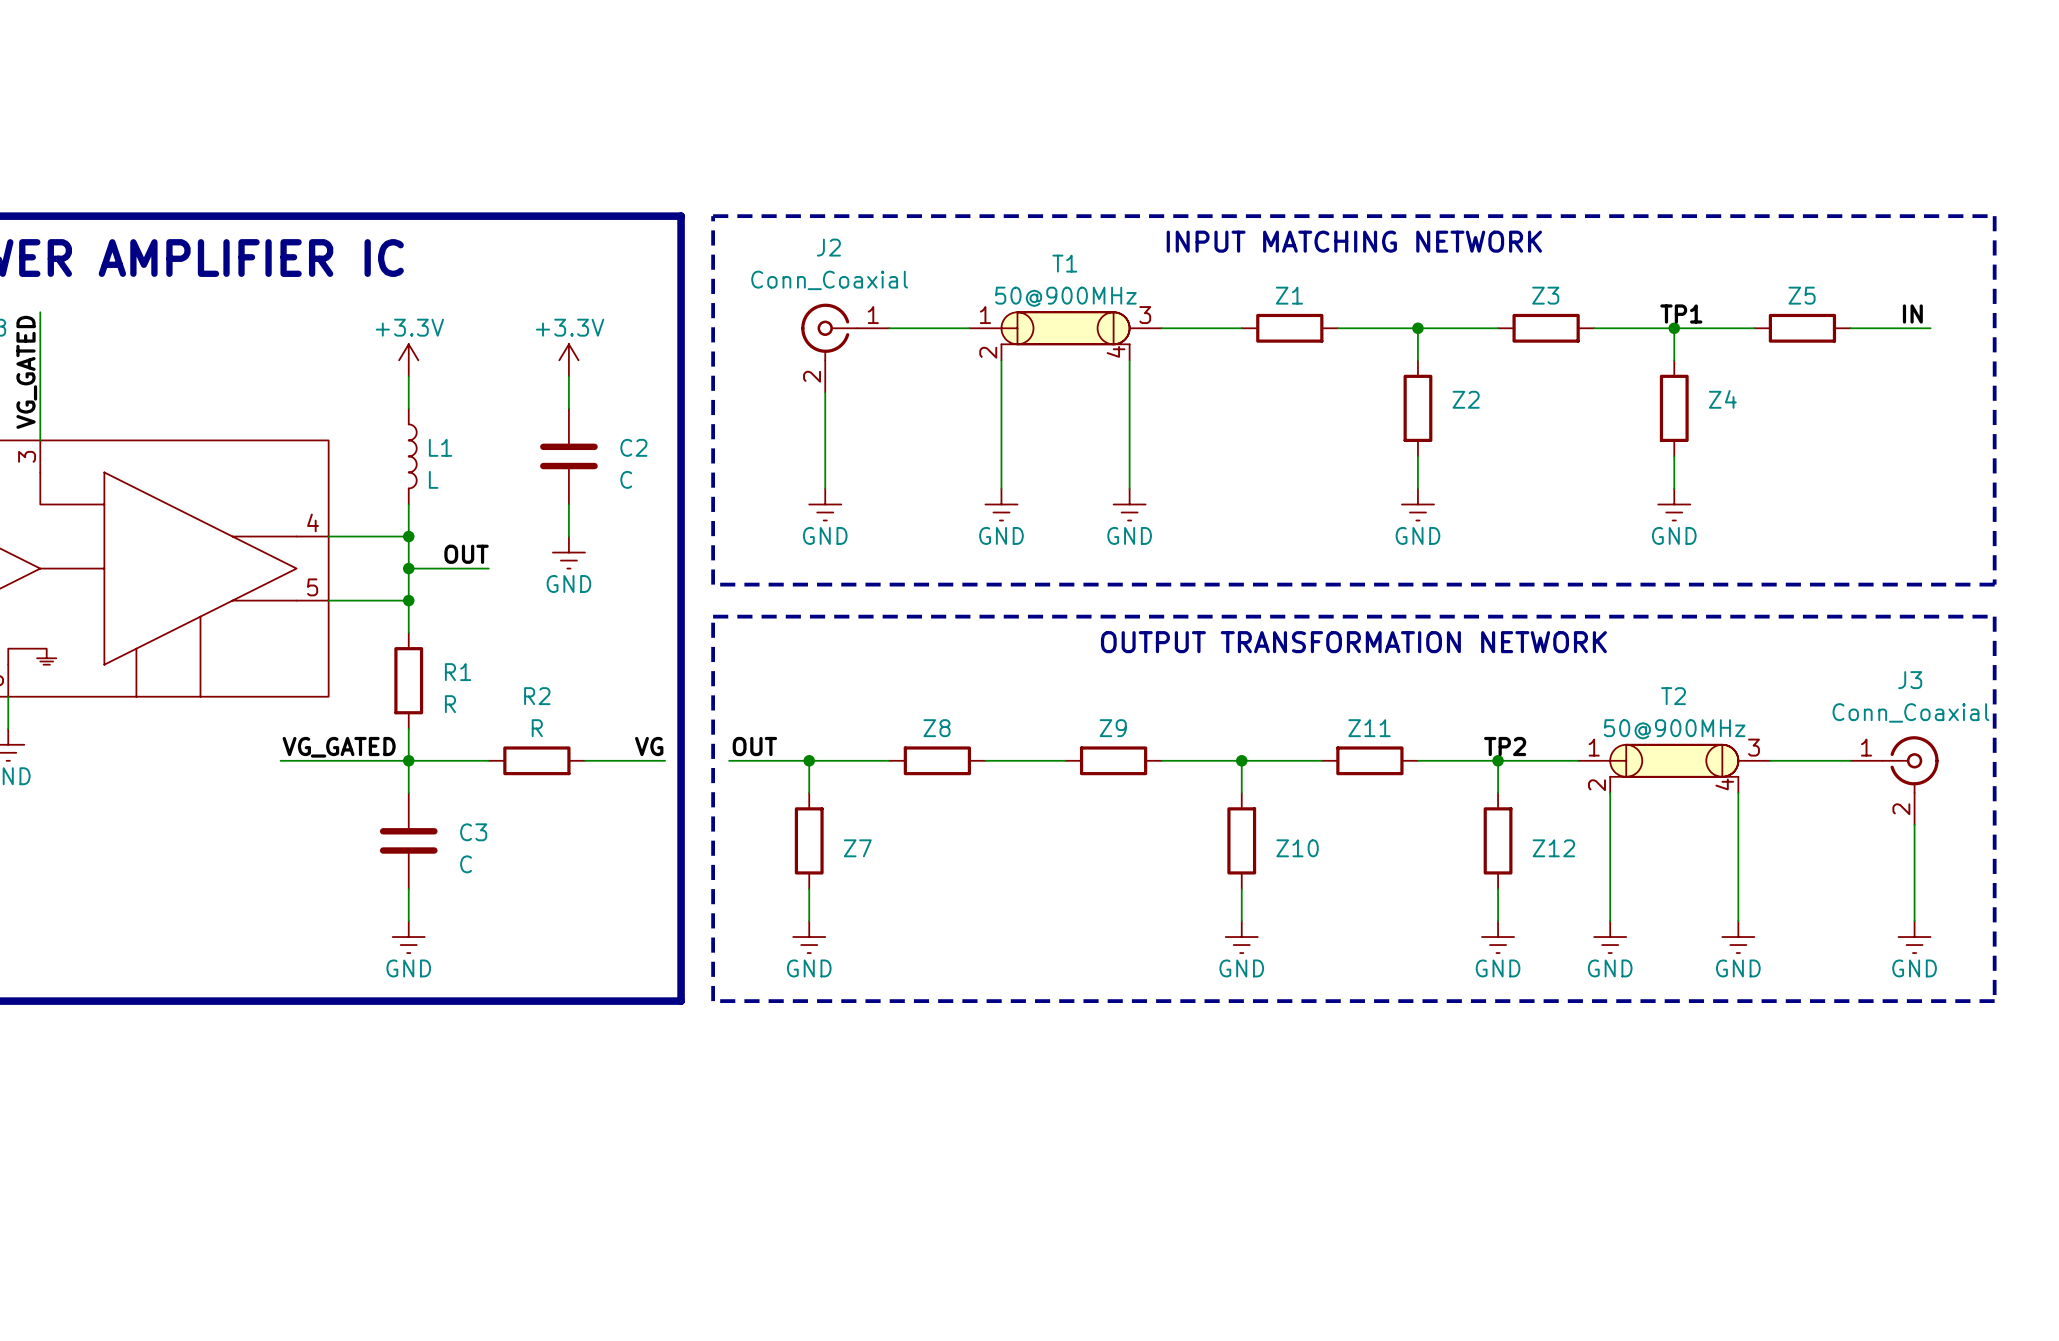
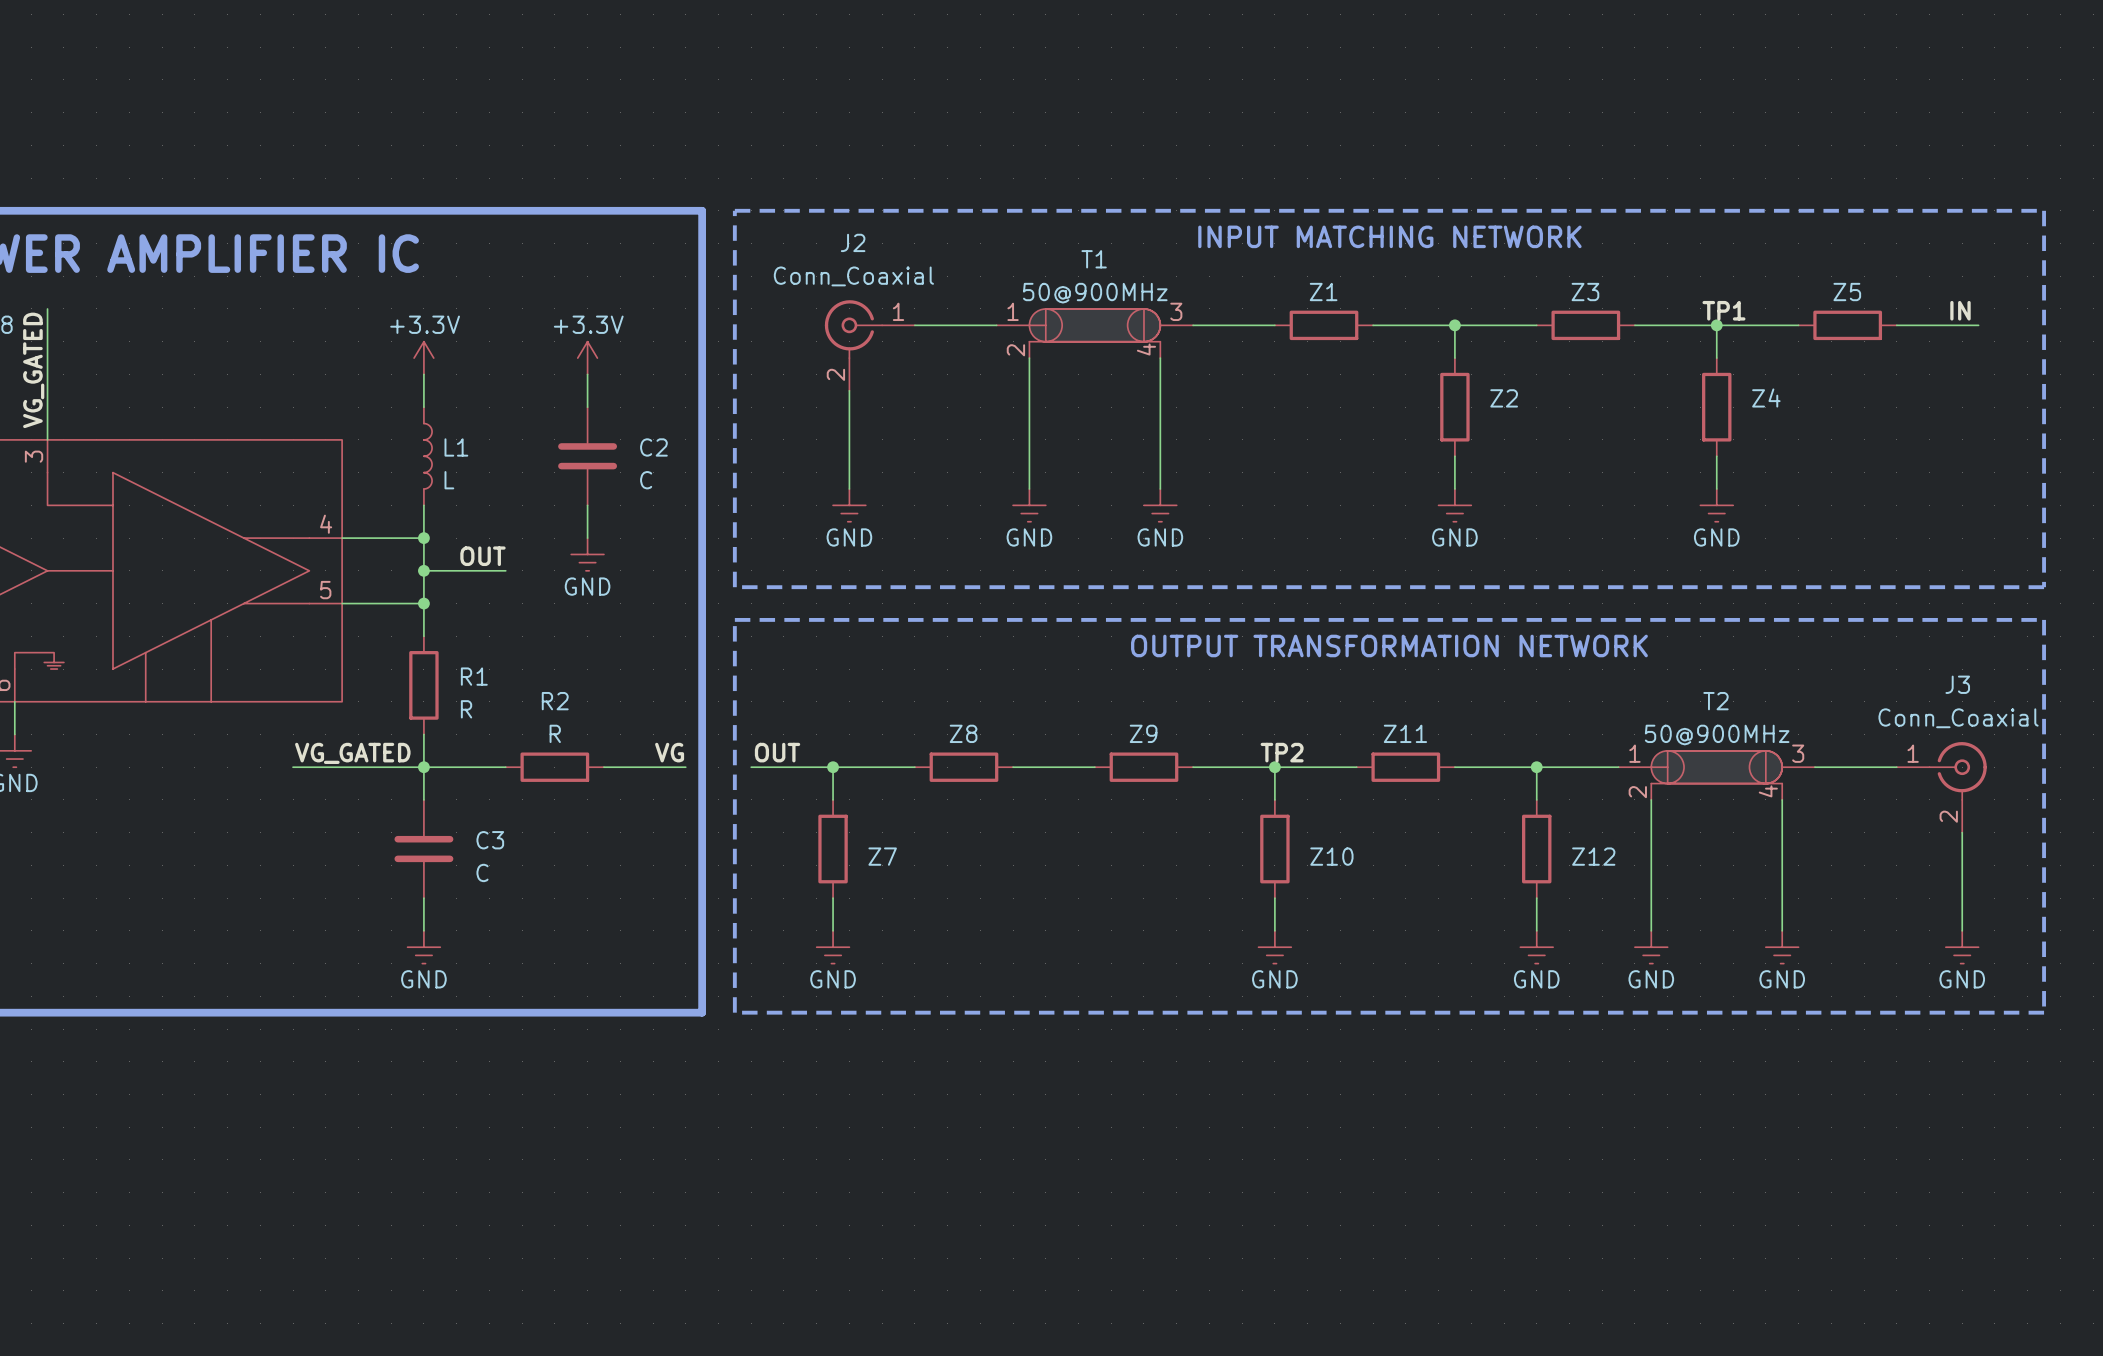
label position: TP2 (1505, 746) -> TP2 (1282, 752)

